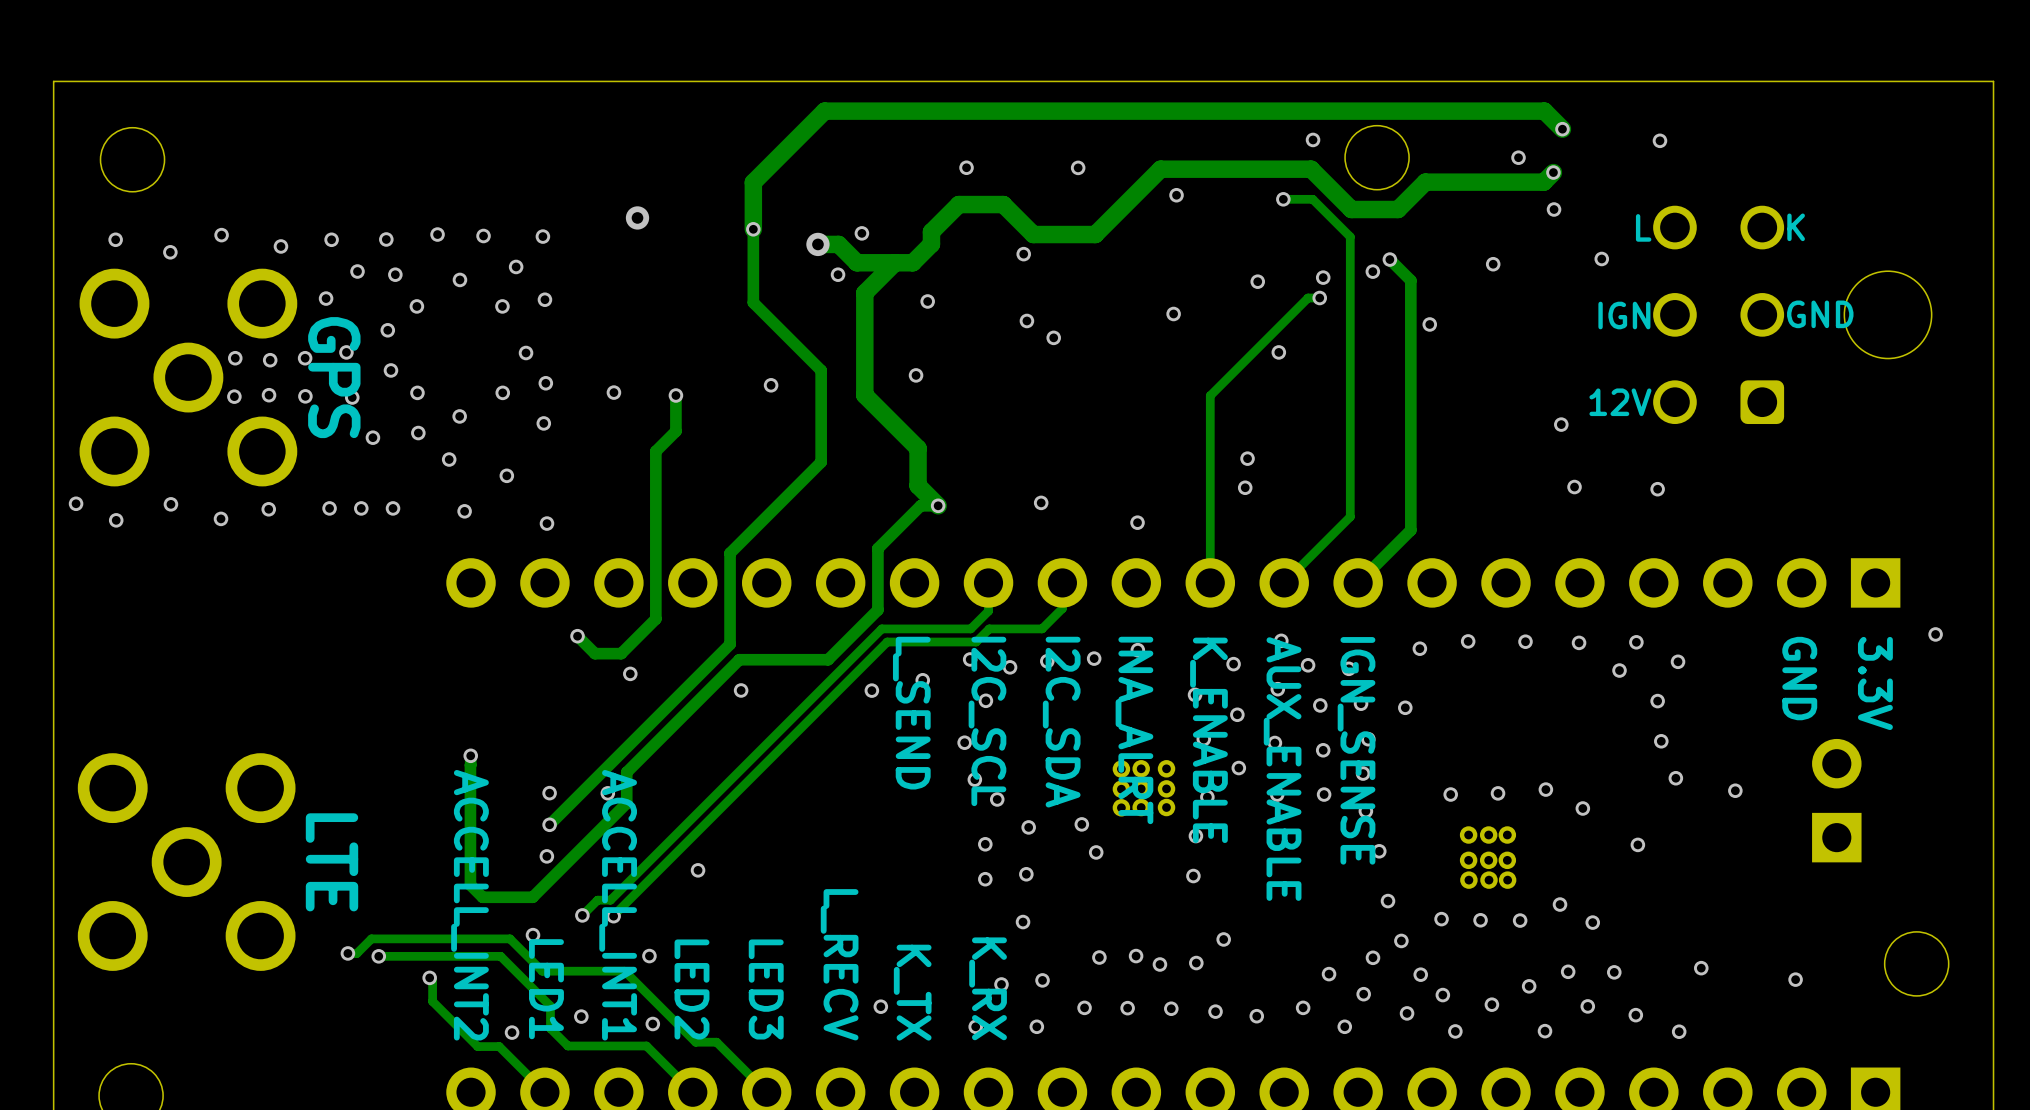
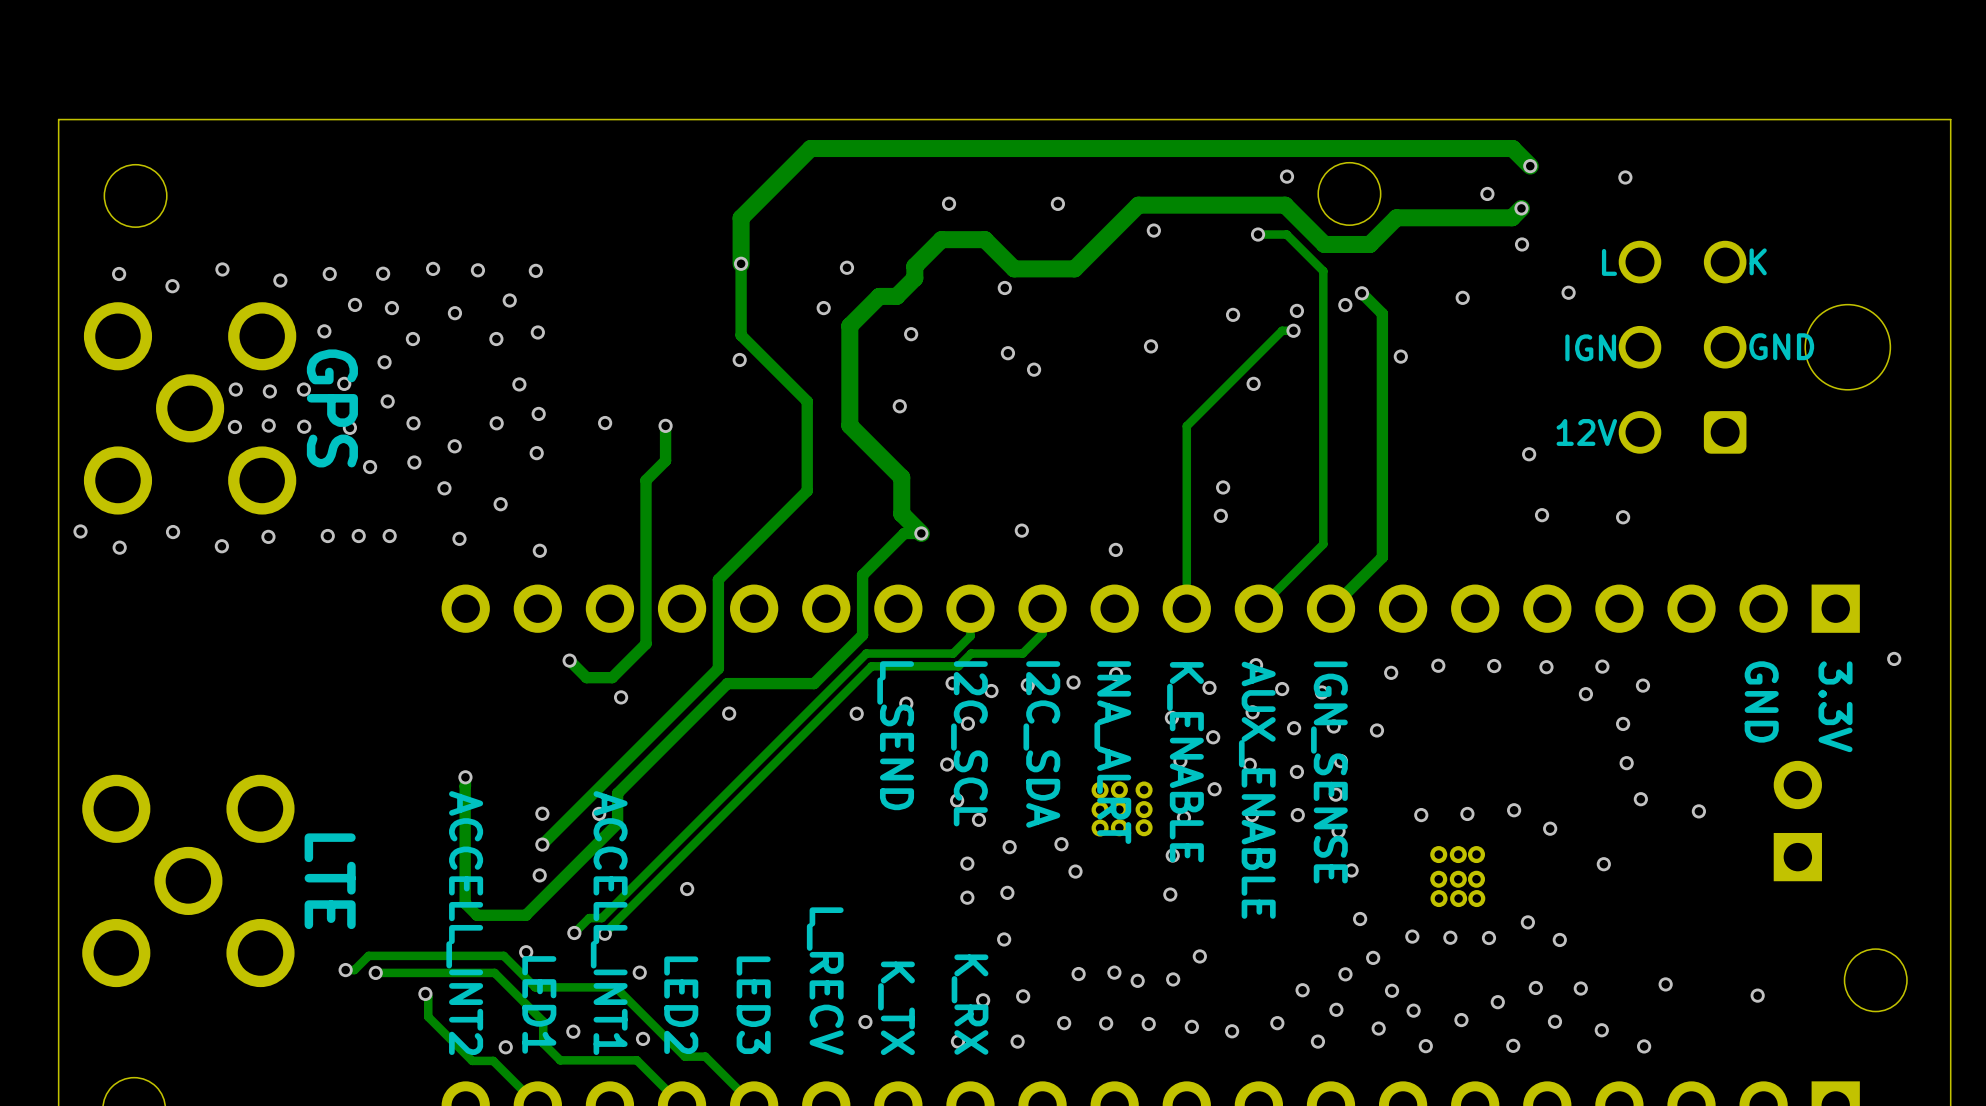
via: (637, 217) -> none
track: (817, 244) (838, 244) (856, 262) (895, 262) -> none
via: (817, 244) -> none
via position: (771, 385) -> (739, 360)

